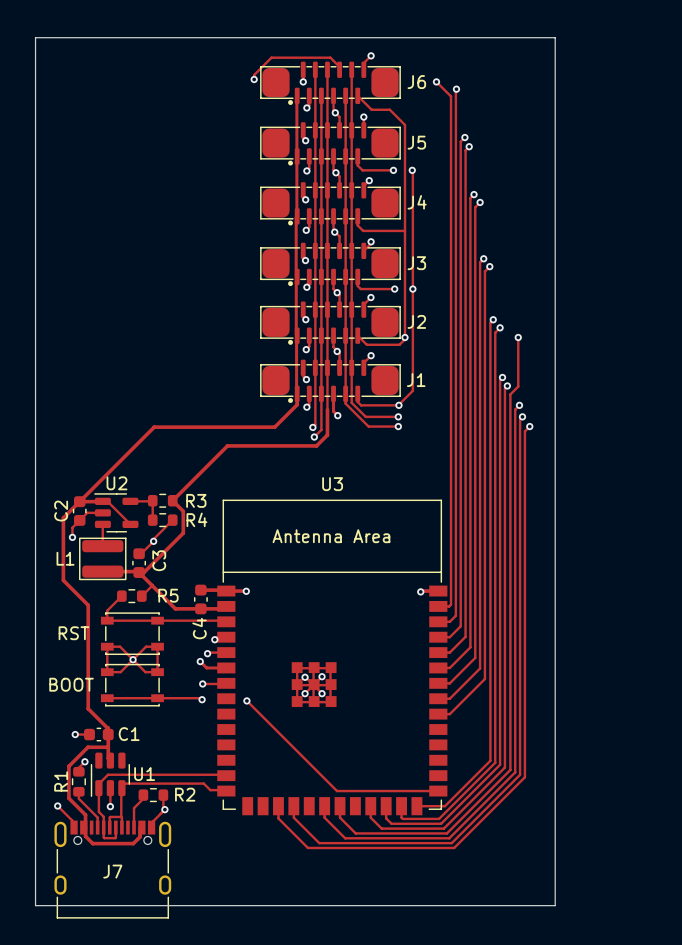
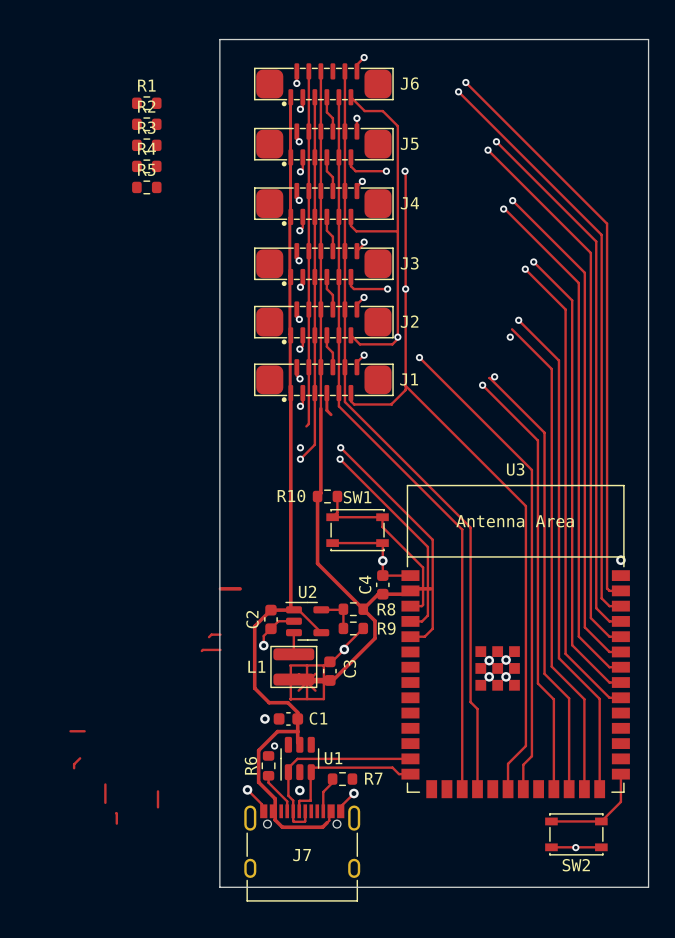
board edge: (225, 37) (35, 37) (35, 905) (555, 905) (555, 37) -> (219, 39) (219, 887) (648, 887) (648, 39) (546, 39)
track: (339, 69) (339, 66) (330, 57) (271, 57) (254, 75) (254, 79) -> none
via: (254, 79) -> none
track: (436, 81) (451, 96) (451, 604) (449, 606) (438, 606) -> none
via: (436, 81) -> none
track: none -> (465, 82) (607, 223) (607, 588) (609, 590) (620, 590)
via: none -> (465, 82)
track: (456, 89) (455, 615) (449, 621) (438, 621) -> none
via: (456, 89) -> none
track: none -> (458, 91) (601, 234) (601, 598) (609, 606) (620, 606)
via: none -> (458, 91)
via: (335, 112) -> none
track: (464, 137) (460, 141) (460, 626) (449, 637) (438, 637) -> none
via: (464, 137) -> none
track: none -> (496, 141) (596, 241) (596, 608) (609, 621) (620, 621)
via: none -> (496, 141)
track: (469, 146) (465, 150) (465, 636) (449, 652) (438, 652) -> none
via: (469, 146) -> none
track: none -> (488, 150) (590, 252) (590, 618) (609, 636) (620, 636)
via: none -> (488, 150)
via: (335, 172) -> none
track: (474, 194) (470, 198) (470, 647) (449, 667) (438, 667) -> none
via: (474, 194) -> none
track: none -> (512, 200) (584, 272) (584, 627) (609, 651) (620, 651)
via: none -> (512, 200)
track: (480, 202) (475, 207) (475, 657) (449, 683) (438, 683) -> none
via: (480, 202) -> none
track: none -> (503, 209) (578, 283) (578, 636) (609, 667) (620, 667)
via: none -> (503, 209)
via: (334, 232) -> none
track: (483, 258) (480, 262) (480, 668) (449, 698) (438, 698) -> none
via: (483, 258) -> none
track: none -> (533, 261) (572, 300) (572, 645) (609, 682) (620, 682)
via: none -> (533, 261)
track: (489, 266) (484, 271) (484, 678) (449, 714) (438, 714) -> none
via: (489, 266) -> none
track: none -> (525, 269) (565, 309) (565, 653) (609, 697) (620, 697)
via: none -> (525, 269)
via: (337, 292) -> none
track: (493, 319) (490, 322) (490, 760) (444, 806) (416, 806) -> none
via: (493, 319) -> none
track: none -> (518, 320) (558, 360) (558, 658) (599, 698) (599, 789)
via: none -> (518, 320)
track: (500, 327) (495, 332) (495, 762) (439, 818) (402, 818) (401, 806) -> none
via: (500, 327) -> none
track: none -> (512, 329) (551, 369) (551, 666) (584, 699) (584, 789)
track: (518, 337) (518, 386) (510, 394) (510, 769) (446, 833) (355, 833) (340, 817) (340, 806) -> none
via: (337, 351) -> none
track: none -> (419, 357) (531, 470) (531, 756) (523, 764) (523, 789)
via: none -> (419, 357)
track: (502, 377) (500, 379) (500, 764) (441, 823) (391, 823) (386, 818) (386, 806) -> none
track: none -> (489, 378) (544, 432) (544, 673) (569, 698) (569, 789)
track: none -> (482, 385) (537, 440) (537, 683) (553, 699) (553, 789)
track: (507, 385) (504, 388) (504, 767) (443, 828) (381, 828) (370, 817) (370, 806) -> none
via position: (507, 385) -> (482, 385)
track: none -> (405, 385) (525, 506) (525, 746) (508, 763) (508, 789)
track: (345, 403) (368, 426) (398, 426) -> (338, 402) (338, 406) (462, 529) (462, 789)
track: (297, 404) (274, 427) (154, 427) (63, 518) (63, 580) (88, 605) (88, 708) (108, 728) (108, 758) (110, 760) -> (290, 403) (290, 606) (293, 609)
via: (398, 405) -> none
track: (519, 405) (515, 409) (515, 772) (449, 838) (345, 838) (324, 817) (324, 806) -> none
via: (519, 405) -> none
via: (337, 415) -> none
track: (365, 416) (398, 416) -> (358, 415) (470, 527) (470, 702) (477, 709) (477, 789)
via: (398, 416) -> none
track: (522, 416) (520, 419) (520, 774) (451, 843) (319, 843) (293, 817) (293, 806) -> none
via: (522, 416) -> none
via: (398, 426) -> none
track: (529, 426) (524, 431) (524, 777) (454, 847) (307, 847) (278, 818) (278, 806) -> none
via: (529, 426) -> none
via: (312, 427) -> none
track: (321, 429) (314, 437) -> (314, 428) (314, 444) (300, 459)
track: (327, 435) (316, 445) (227, 445) (172, 500) (183, 511) (183, 533) (143, 572) (139, 572) -> (320, 433) (320, 493) (317, 496) (317, 563) (374, 620) (374, 638) (332, 680) (293, 679)
via: (314, 437) -> none
via: none -> (300, 447)
track: none -> (340, 447) (432, 539) (432, 628) (424, 636) (410, 636)
via: none -> (340, 447)
via: none -> (300, 459)
track: none -> (340, 459) (427, 546) (427, 615) (422, 621) (410, 621)
via: none -> (340, 459)
R10: none -> (327, 496)
track: none -> (337, 496) (337, 512) (332, 517) (382, 517) (382, 527) (423, 567) (423, 604) (410, 606)
R3 position: (162, 500) -> (146, 145)
R3 name position: R3 (196, 500) -> R3 (146, 127)
track: (79, 501) (107, 501) (130, 524) -> none
track: (130, 501) (152, 500) (152, 520) -> (321, 609) (343, 609) (343, 628)
C2 position: (79, 511) -> (270, 619)
track: (102, 512) (87, 512) (72, 527) (72, 537) -> (293, 621) (278, 621) (263, 635) (263, 645)
U2 position: (116, 512) -> (307, 621)
R4 name position: R4 (196, 519) -> R4 (146, 148)
R4 position: (162, 520) -> (146, 166)
track: (172, 520) (139, 553) -> (363, 628) (329, 661)
track: (102, 524) (102, 546) -> (293, 632) (293, 654)
SW1: none -> (357, 530)
via: (72, 537) -> none
via: (153, 541) -> none
track: none -> (332, 543) (382, 543) (382, 575)
L1 position: (102, 558) -> (293, 666)
via: none -> (382, 560)
via: none -> (620, 560)
C3 position: (139, 563) -> (329, 671)
track: (102, 571) (138, 571) (175, 608) (218, 608) (221, 605) -> none
track: none -> (382, 575) (410, 575)
track: (152, 585) (141, 596) -> none
track: (200, 590) (221, 590) -> none
via: (246, 591) -> none
via: (420, 591) -> none
track: none -> (410, 590) (407, 594) (378, 594) (363, 609)
R5 name position: R5 (168, 595) -> R5 (146, 169)
track: (121, 596) (107, 610) (107, 620) (226, 621) -> none
R5 position: (131, 596) -> (146, 187)
C4 position: (200, 599) -> (382, 584)
R8: none -> (353, 609)
track: none -> (293, 609) (298, 609) (321, 632)
track: none -> (293, 609) (270, 610) (254, 626) (254, 688) (269, 702) (287, 702) (297, 712) (297, 742) (299, 744)
C4 name position: C4 (199, 628) -> C4 (365, 584)
R9: none -> (353, 628)
part: RST (132, 633) -> none
via: (214, 639) -> none
track: (106, 646) (107, 672) (120, 672) (146, 646) (157, 646) -> none
track: (107, 646) (120, 646) (145, 672) (157, 672) (156, 646) -> none
via: none -> (263, 645)
via: none -> (344, 649)
via: (207, 653) -> none
U3 position: (332, 657) -> (515, 641)
via: (133, 659) -> none
track: (200, 661) (206, 667) (226, 667) -> none
via: (200, 661) -> none
via: none -> (506, 660)
via: none -> (489, 660)
via: (322, 676) -> none
via: (305, 677) -> none
via: none -> (489, 676)
via: none -> (506, 676)
via: (202, 683) -> none
track: (226, 683) (202, 683) -> none
part: BOOT (132, 685) -> none
via: (305, 693) -> none
via: (322, 693) -> none
track: (107, 698) (202, 699) -> none
via: (202, 699) -> none
track: (246, 700) (337, 791) (438, 791) -> none
via: (246, 700) -> none
via: none -> (264, 718)
via: (75, 734) -> none
C1 position: (98, 734) -> (288, 718)
track: none -> (297, 731) (277, 731) (258, 750) (258, 782) (275, 798) (275, 820) (282, 827) (322, 827) (329, 820) (329, 811)
track: (108, 747) (87, 747) (68, 766) (68, 798) (85, 814) (85, 836) (92, 843) (133, 843) (140, 836) (140, 827) -> none
via: none -> (274, 746)
via: (84, 761) -> none
R6: none -> (268, 765)
U1 position: (110, 774) -> (299, 758)
track: (221, 774) (108, 774) (98, 783) (98, 811) (103, 816) (103, 837) (115, 838) (115, 827) -> (410, 758) (297, 758) (288, 767) (288, 795) (293, 800) (293, 821) (304, 821) (305, 811)
track: none -> (620, 774) (620, 801) (601, 821) (551, 821)
R1 rotation: 0° (78, 781) -> 90° clockwise (146, 103)
R1 position: (78, 781) -> (146, 103)
R7: none -> (342, 779)
track: (221, 790) (210, 790) (203, 783) (124, 783) (121, 788) (121, 816) (110, 816) (109, 827) -> (410, 774) (399, 774) (392, 767) (313, 767) (310, 772) (310, 800) (299, 800) (299, 811)
track: (78, 791) (78, 798) (97, 817) (97, 827) -> (268, 775) (268, 782) (287, 801) (287, 811)
via: none -> (247, 789)
R2 name position: R2 (185, 794) -> R2 (146, 106)
via: none -> (299, 790)
R2 position: (153, 795) -> (146, 124)
track: (144, 797) (134, 808) (134, 827) -> (333, 781) (323, 792) (323, 811)
via: none -> (353, 793)
track: (57, 806) (72, 820) (72, 827) -> (247, 789) (261, 804) (261, 811)
via: (57, 806) -> none
via: (110, 806) -> none
track: (164, 809) (153, 821) (153, 827) -> (353, 793) (342, 804) (342, 811)
via: (164, 809) -> none
SW2: none -> (576, 834)
track: none -> (551, 847) (601, 847)
via: none -> (575, 847)
J7 position: (112, 869) -> (302, 853)

